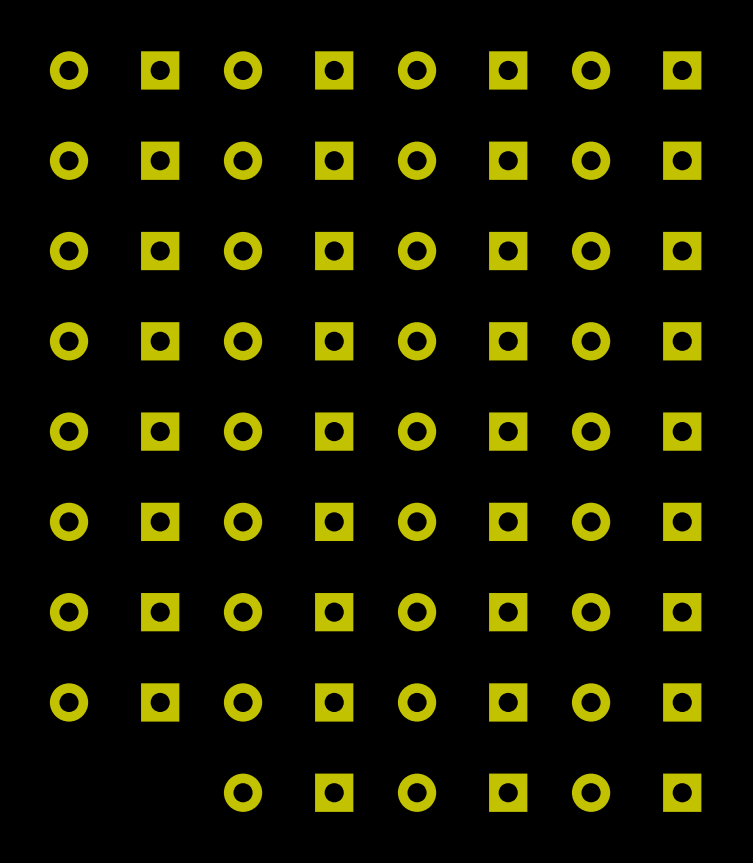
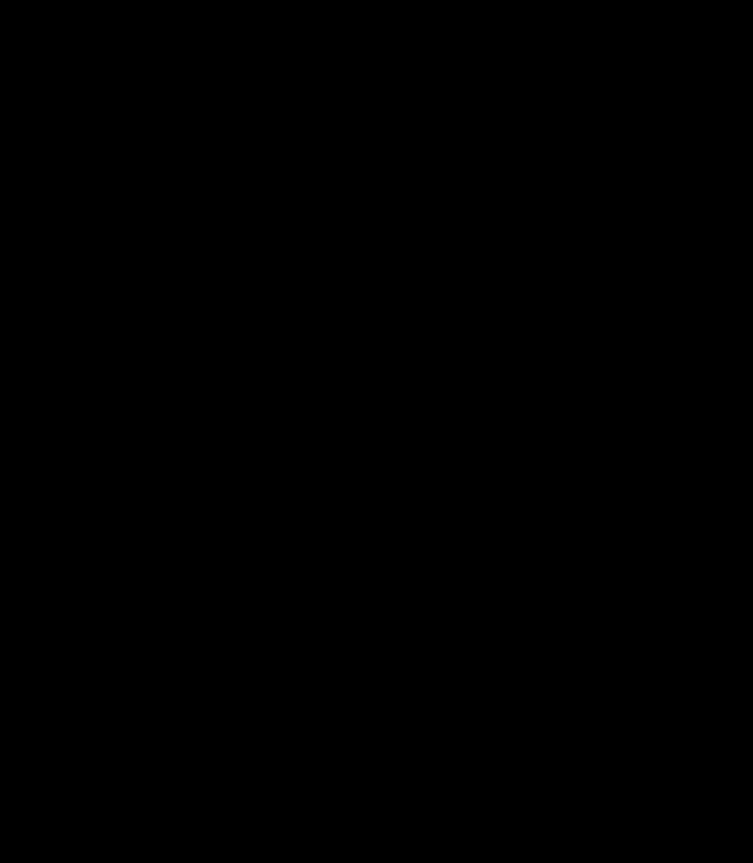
part: (114, 70) -> none
part: (288, 70) -> none
part: (462, 70) -> none
part: (636, 70) -> none
part: (114, 160) -> none
part: (288, 160) -> none
part: (462, 160) -> none
part: (636, 160) -> none
part: (114, 251) -> none
part: (288, 251) -> none
part: (462, 251) -> none
part: (636, 251) -> none
part: (114, 341) -> none
part: (288, 341) -> none
part: (462, 341) -> none
part: (636, 341) -> none
part: (114, 431) -> none
part: (288, 431) -> none
part: (462, 431) -> none
part: (636, 431) -> none
part: (114, 521) -> none
part: (288, 521) -> none
part: (462, 521) -> none
part: (636, 521) -> none
part: (114, 612) -> none
part: (288, 612) -> none
part: (462, 612) -> none
part: (636, 612) -> none
part: (114, 702) -> none
part: (288, 702) -> none
part: (462, 702) -> none
part: (636, 702) -> none
part: (288, 792) -> none
part: (462, 792) -> none
part: (636, 792) -> none

